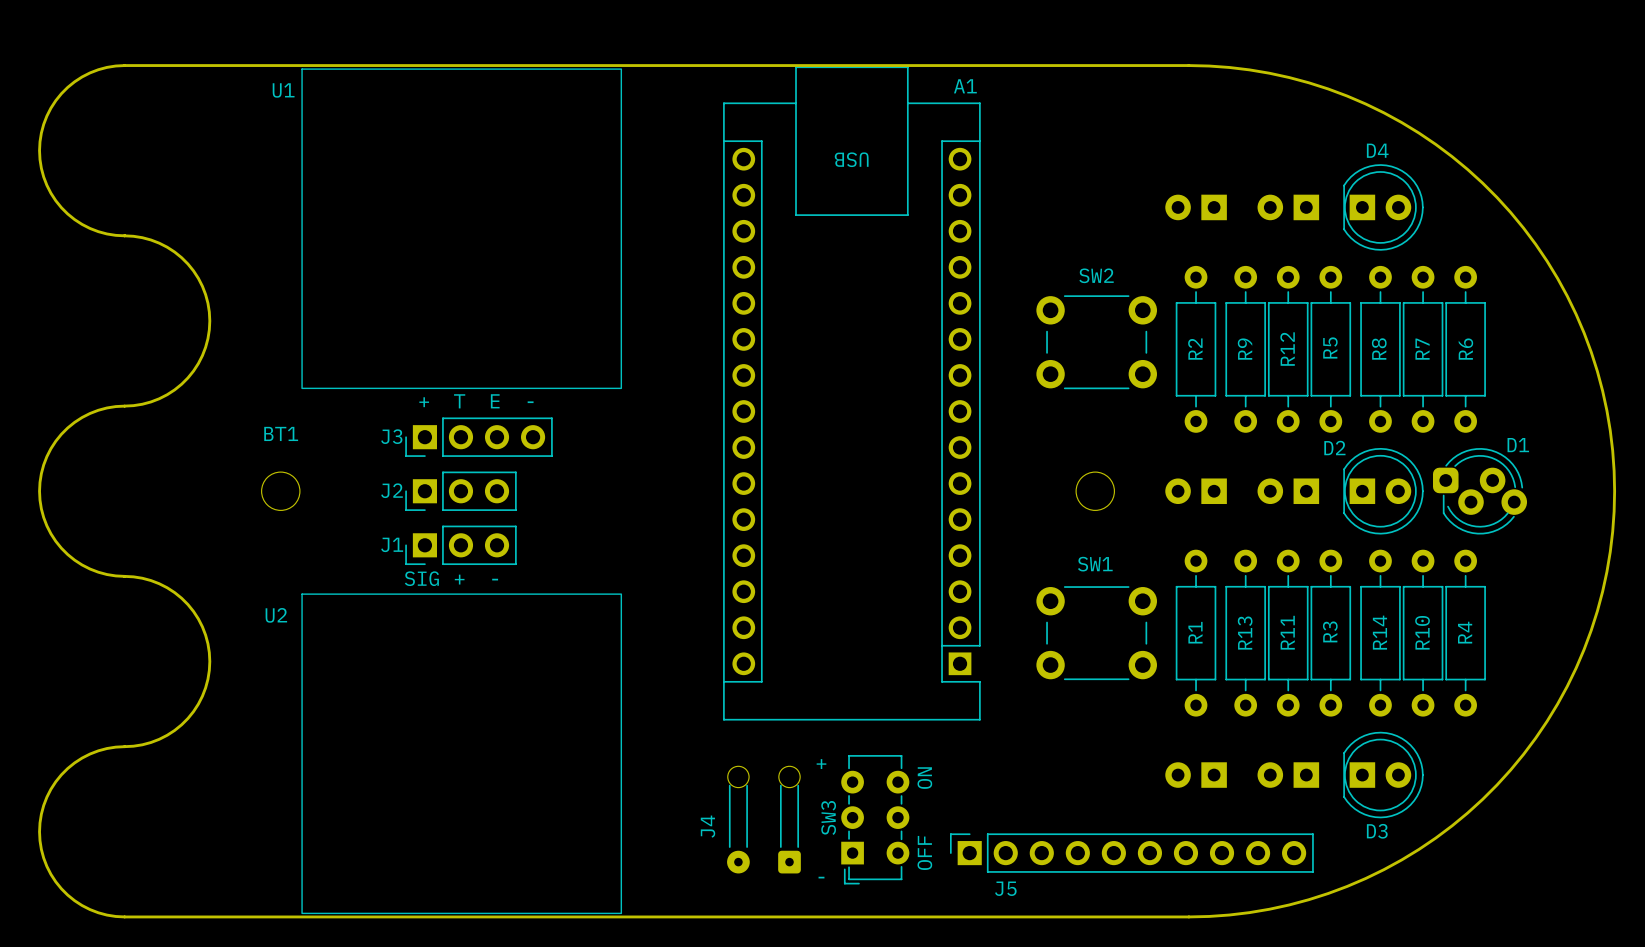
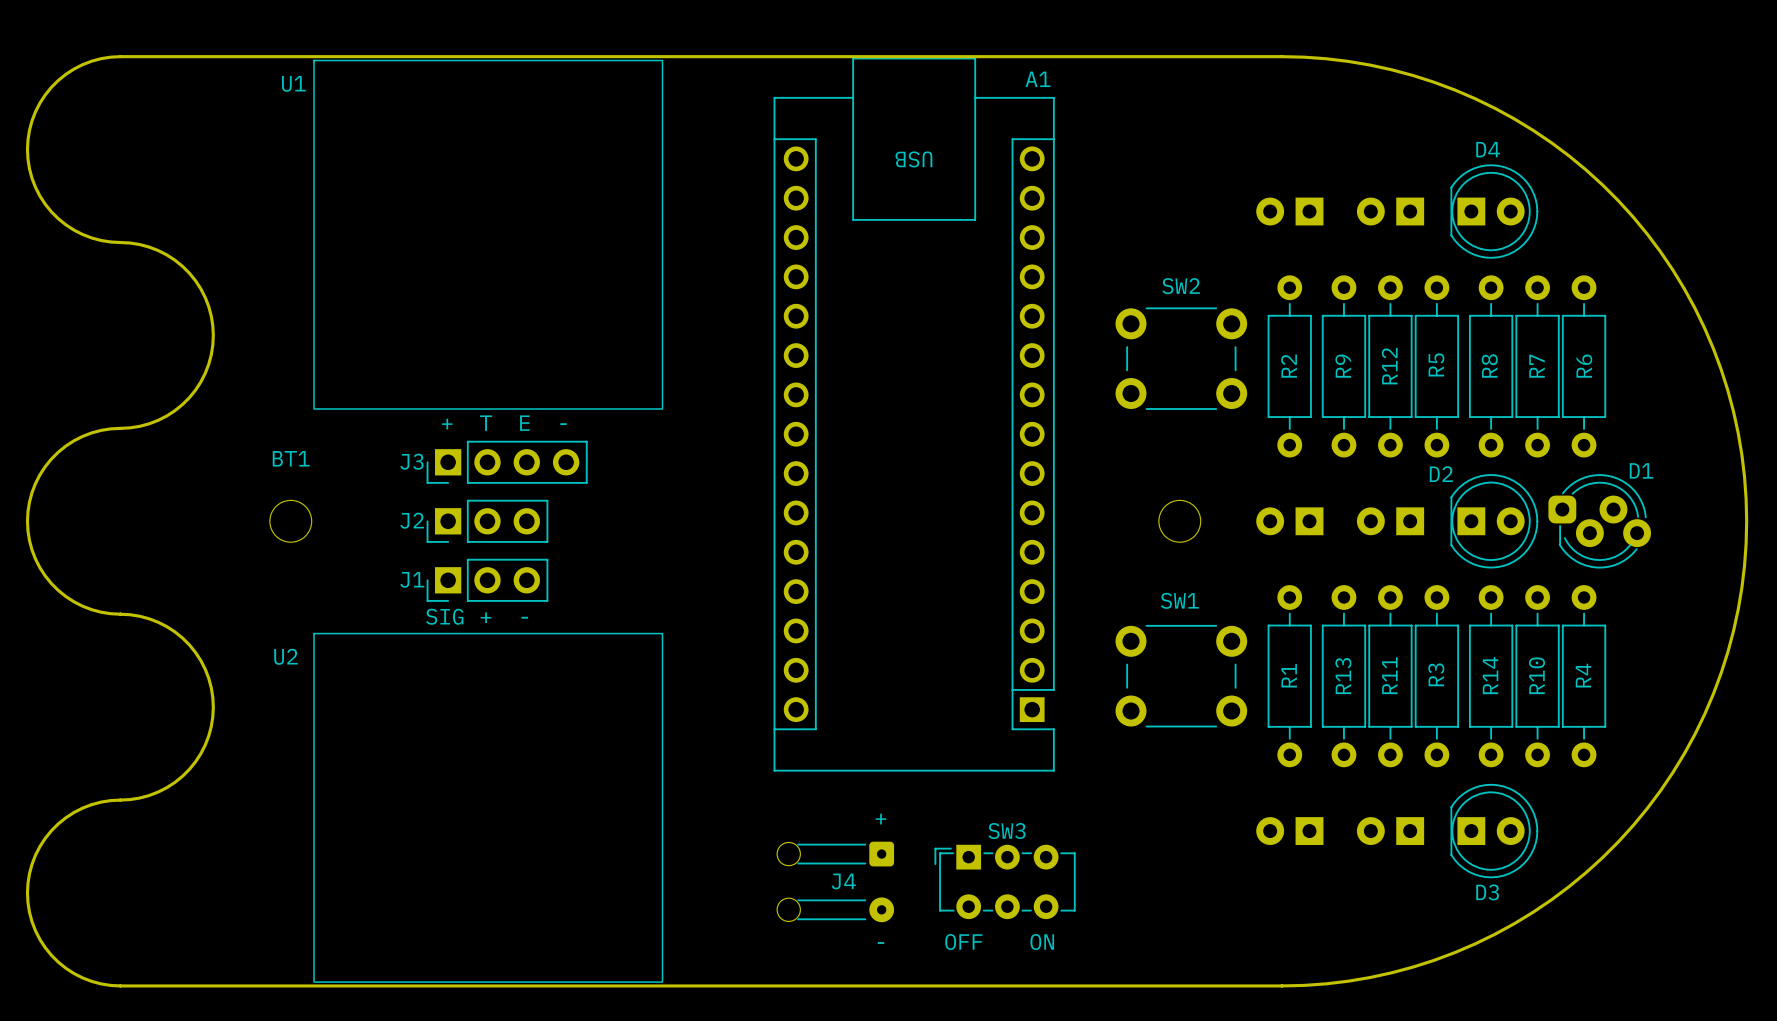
text rotation: 0° (924, 778) -> 90° clockwise (1042, 941)
text position: ON (924, 778) -> ON (1042, 941)
J4 rotation: 0° (763, 819) -> 90° counterclockwise (835, 881)
SW3 rotation: 0° (875, 819) -> 90° clockwise (1005, 881)
J4 name position: J4 (708, 826) -> J4 (843, 881)
text rotation: 0° (924, 852) -> 90° clockwise (963, 941)
J5: (1131, 853) -> none

